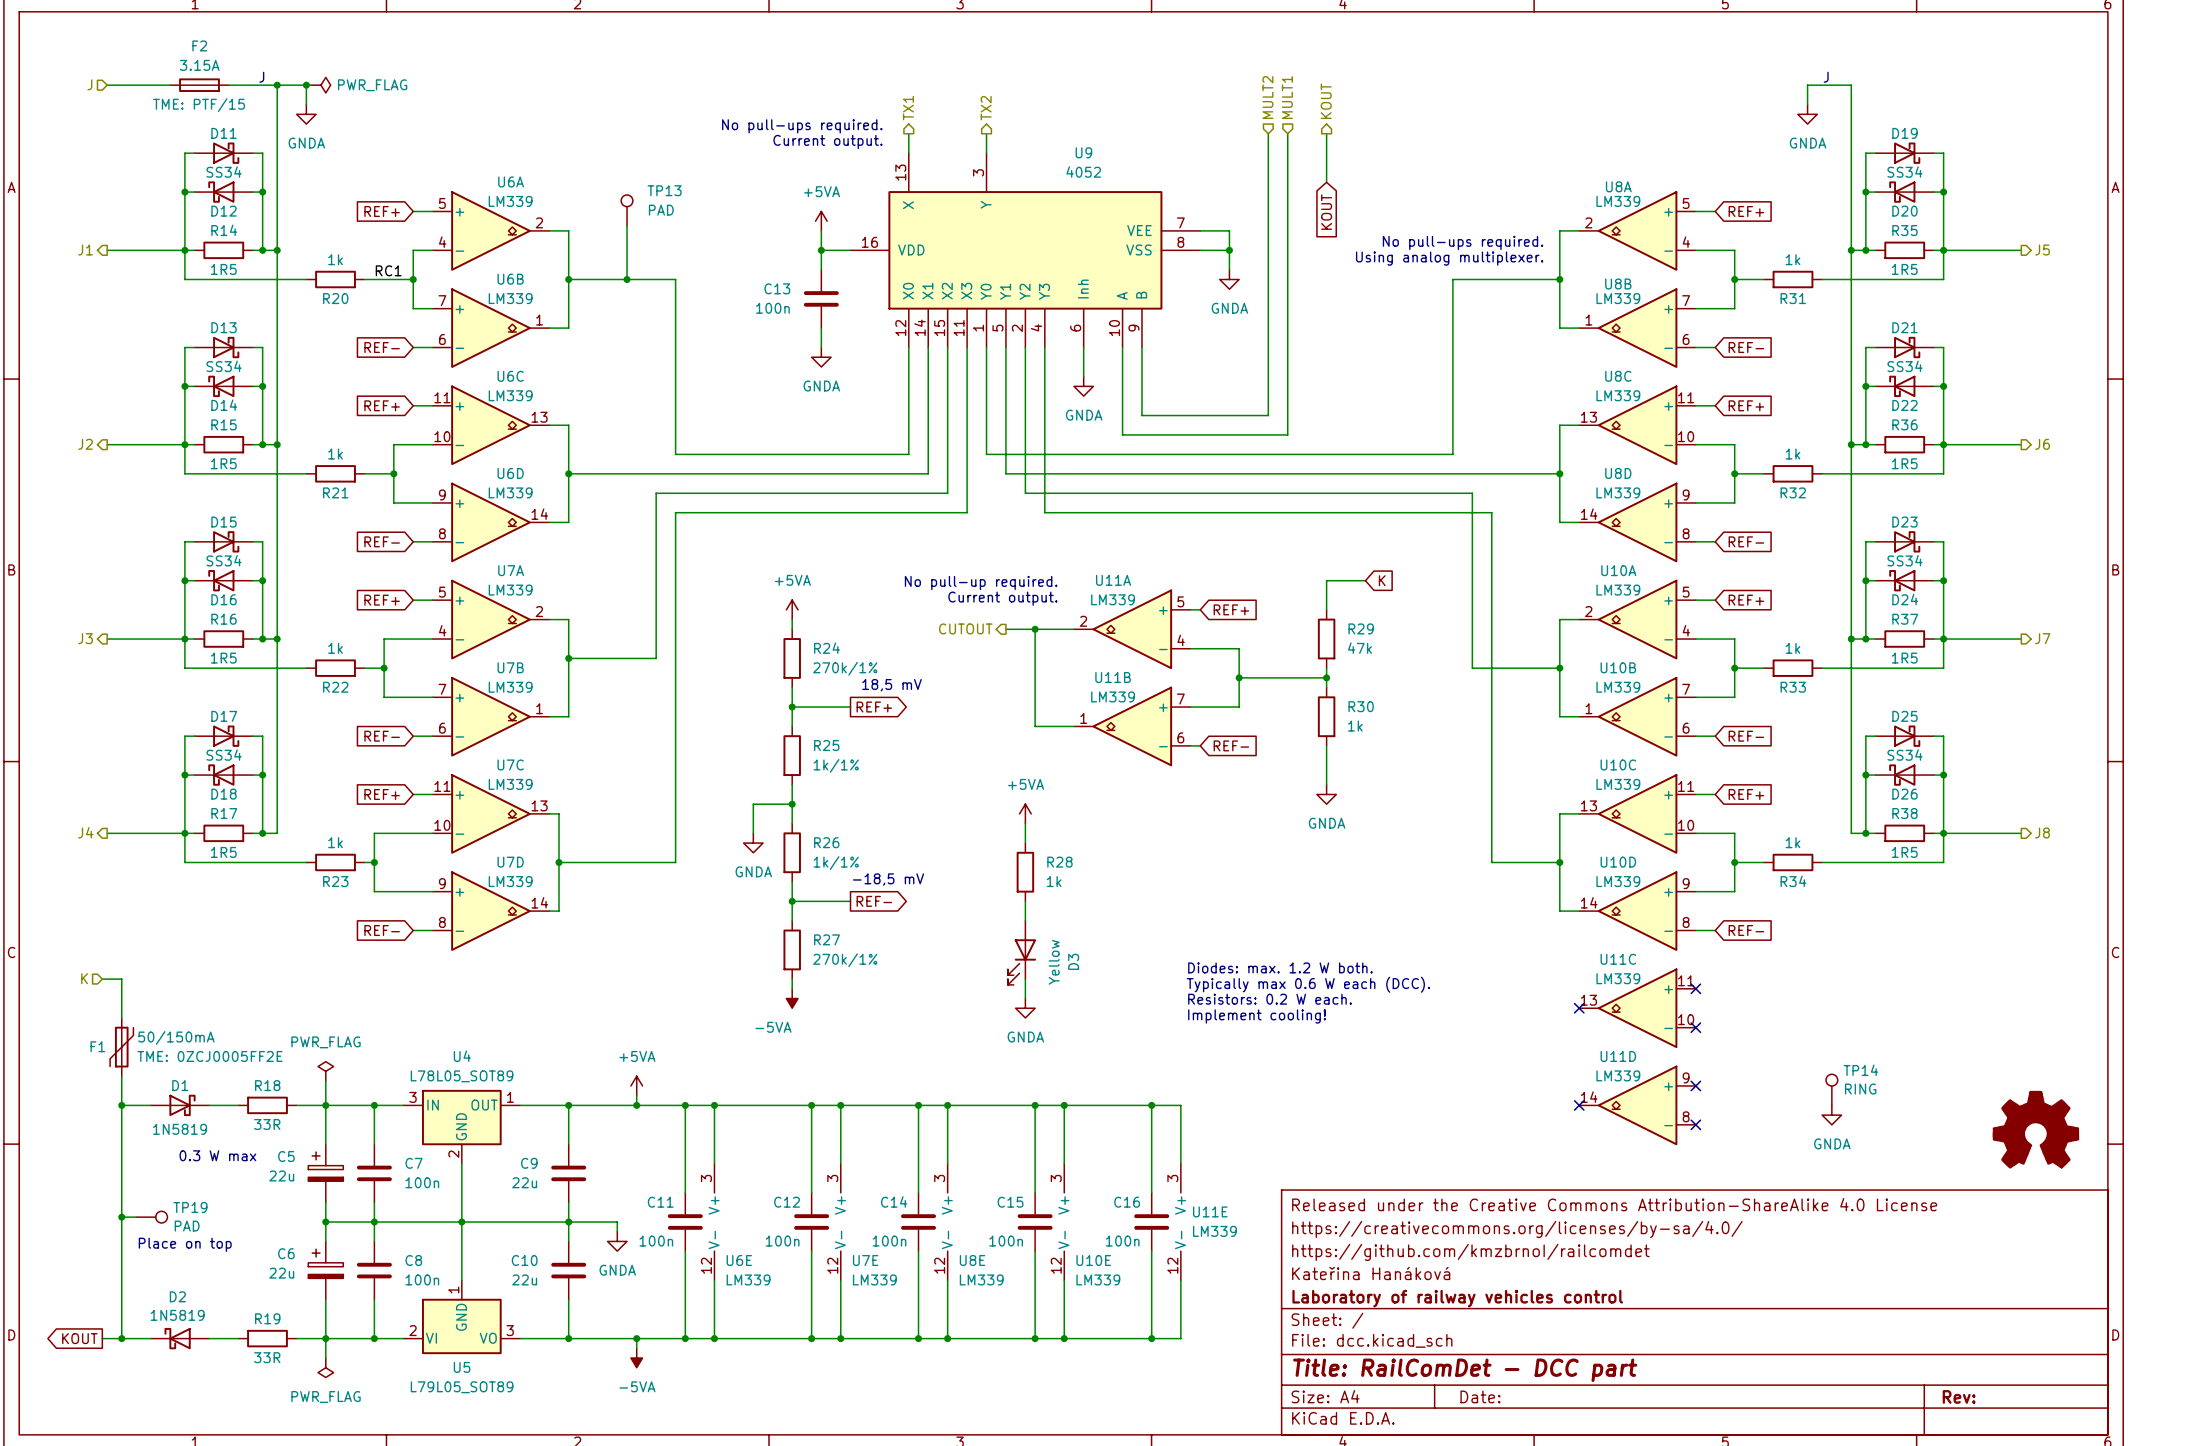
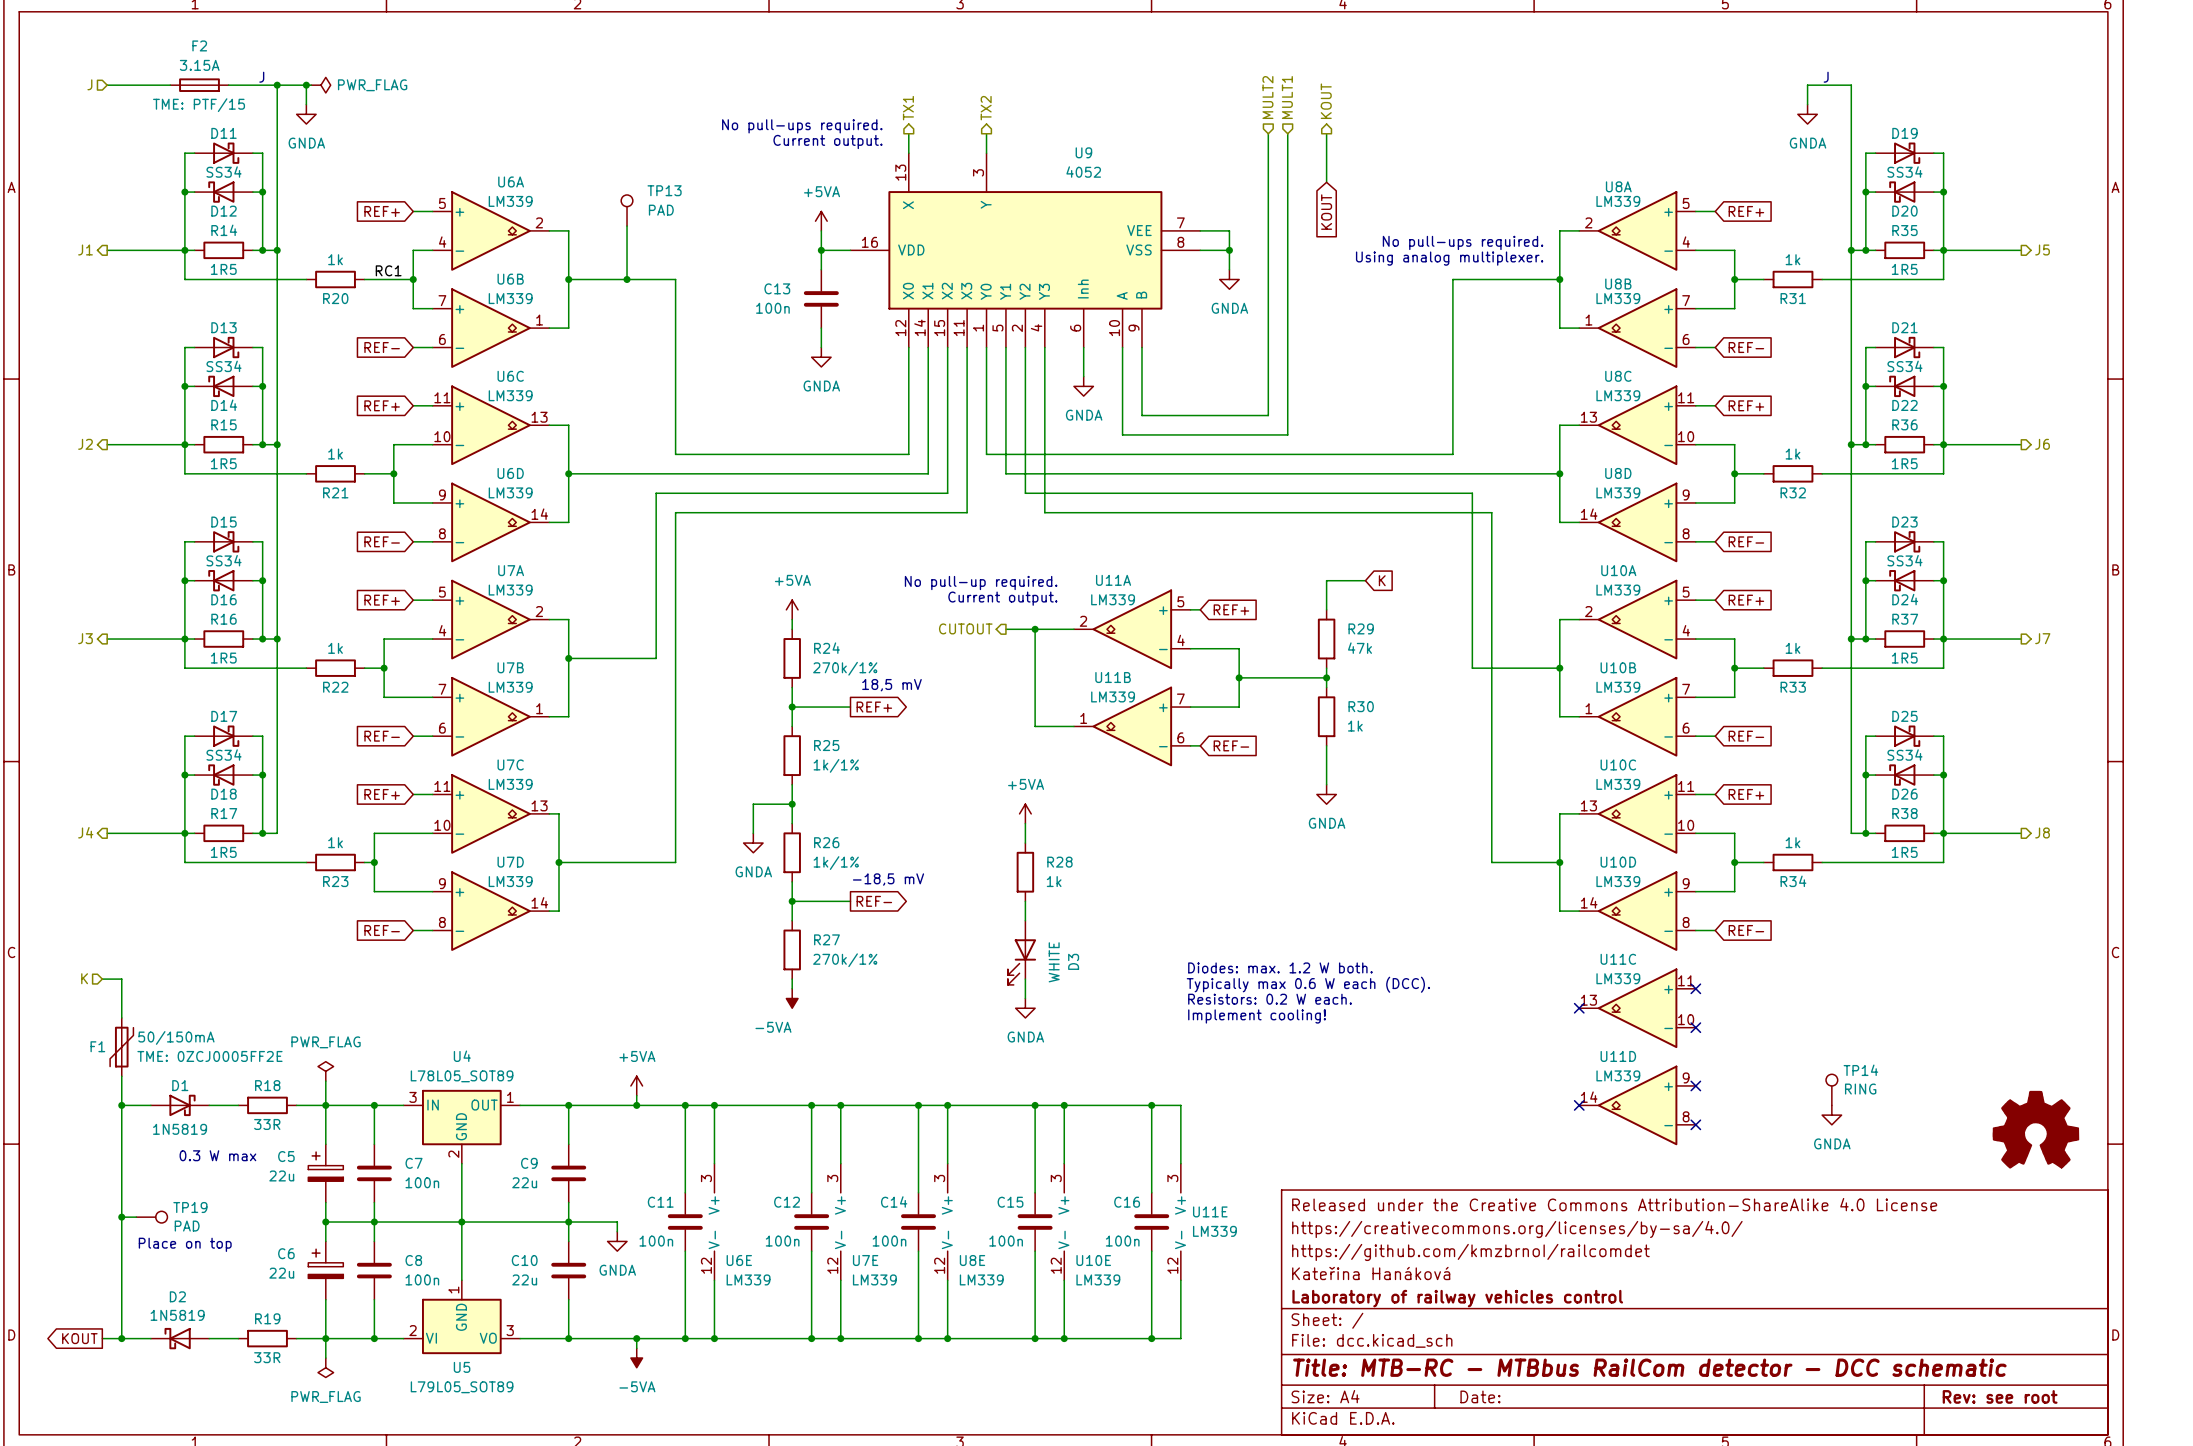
D3 value: Yellow (1054, 962) -> WHITE (1054, 962)
title block: Title: RailComDet - DCC part (1465, 1370) -> Title: MTB-RC - MTBbus RailCom detector - DCC schematic (1649, 1367)
title block: Rev: (1959, 1396) -> Rev: see root (2000, 1396)

